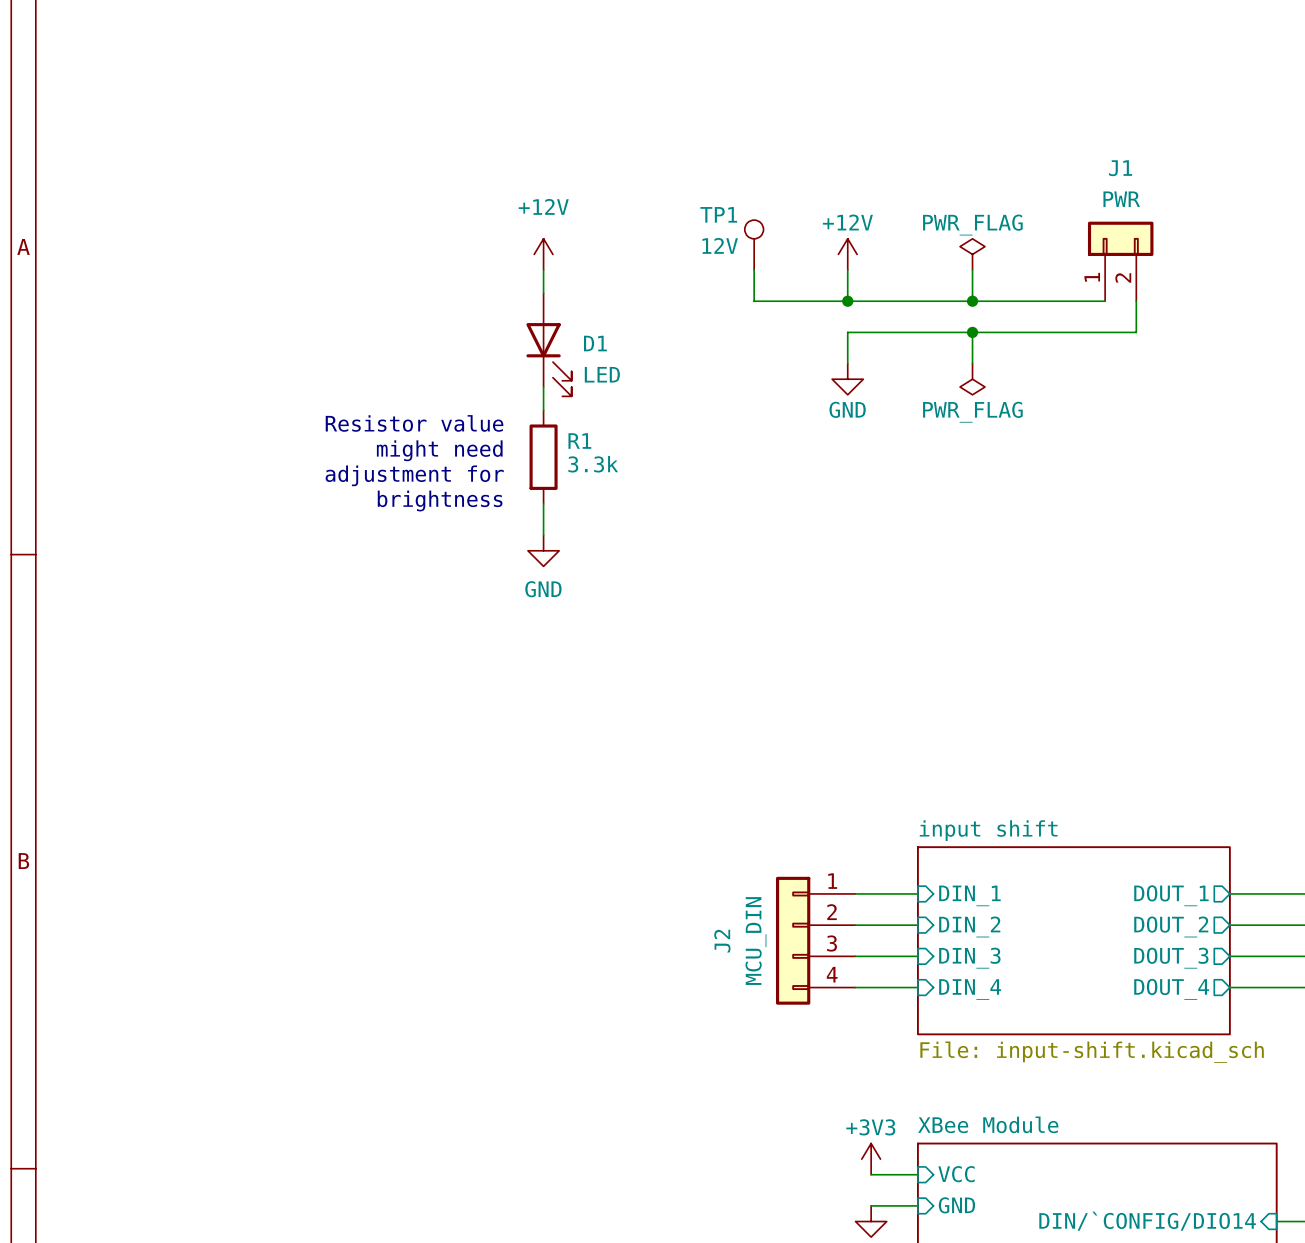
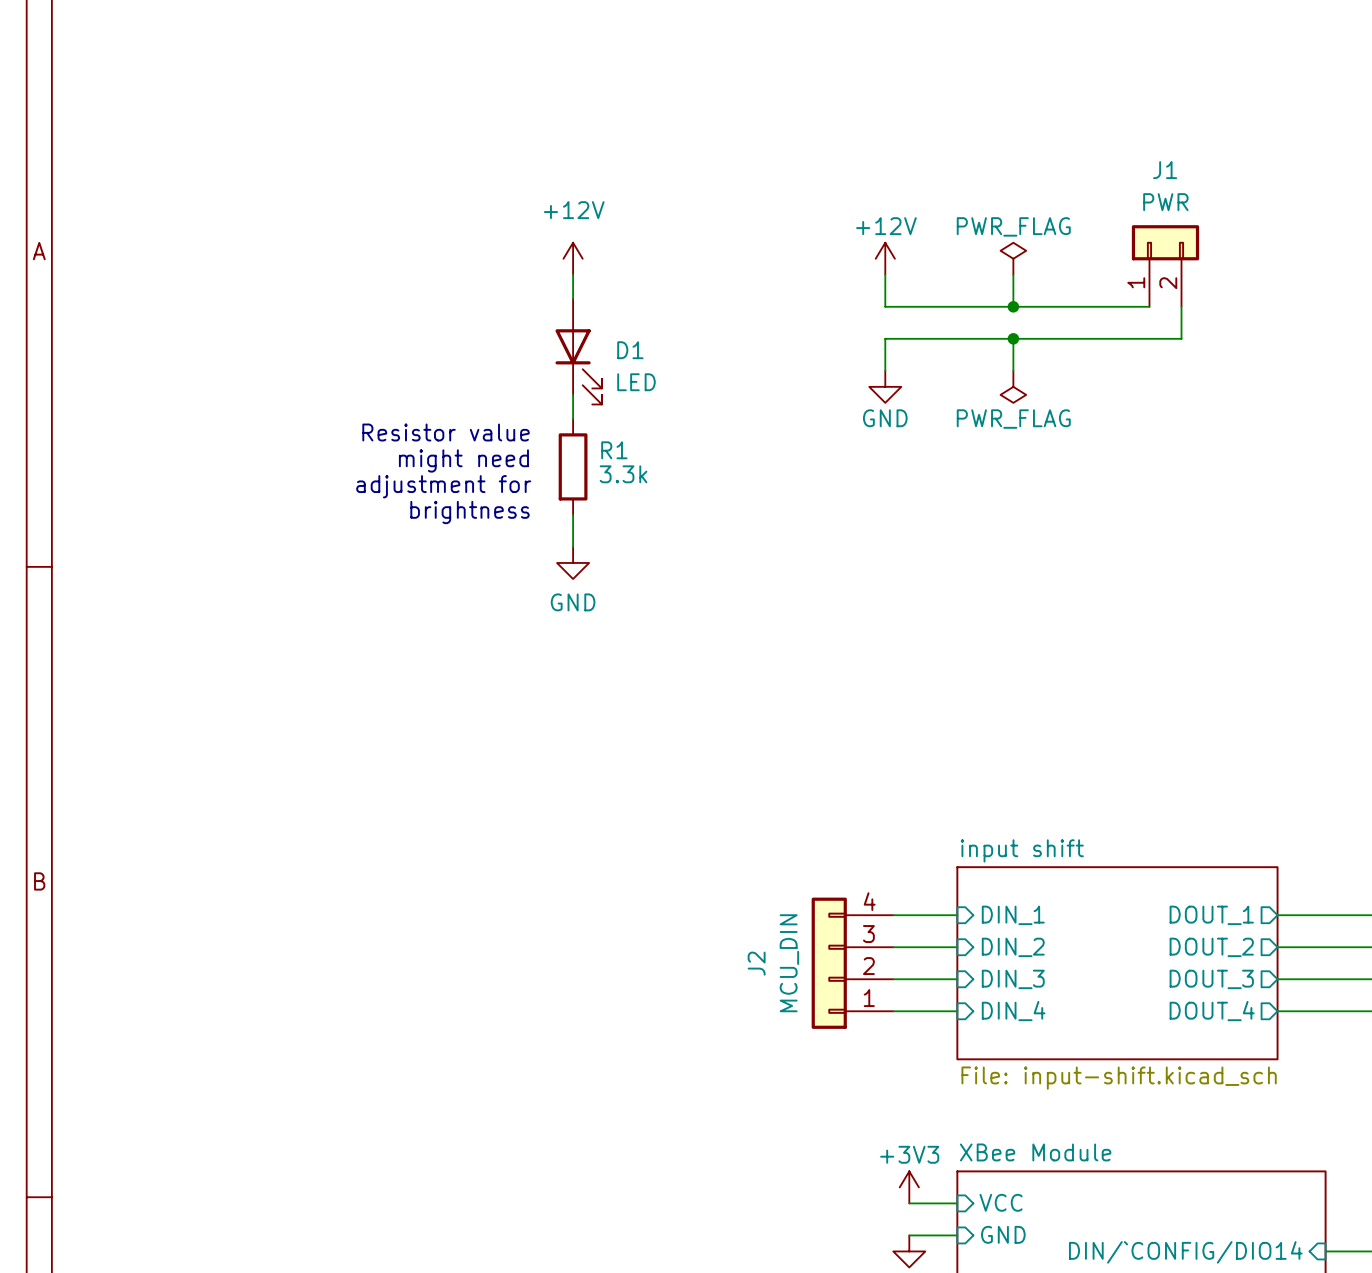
TP1: 12V (754, 245) -> none
wire: (754, 270) (754, 301) (847, 301) -> none
junction: (847, 301) -> none
J2 flip: as is (793, 940) -> up-down (829, 963)

